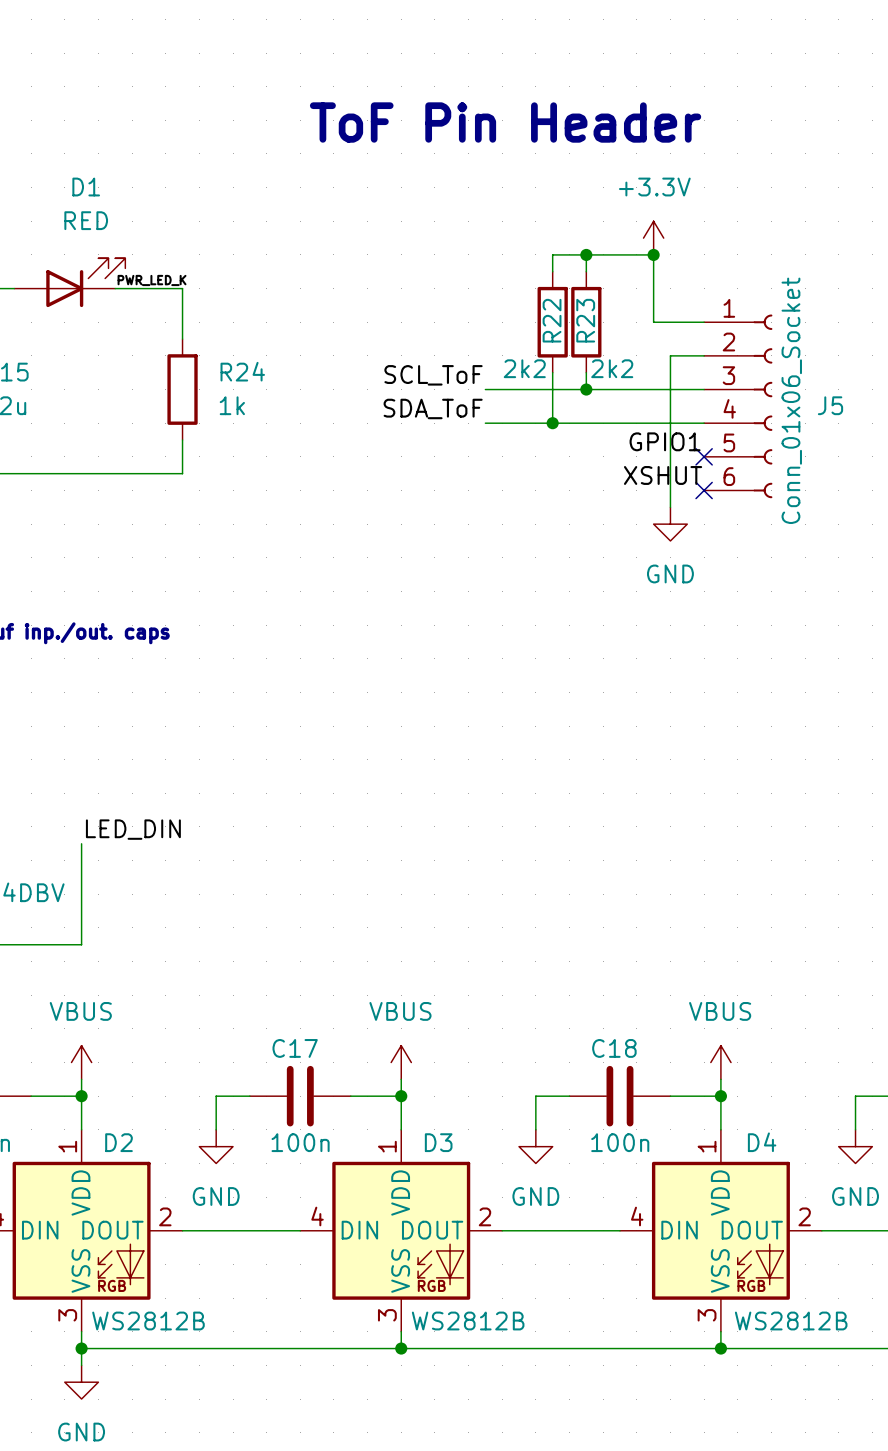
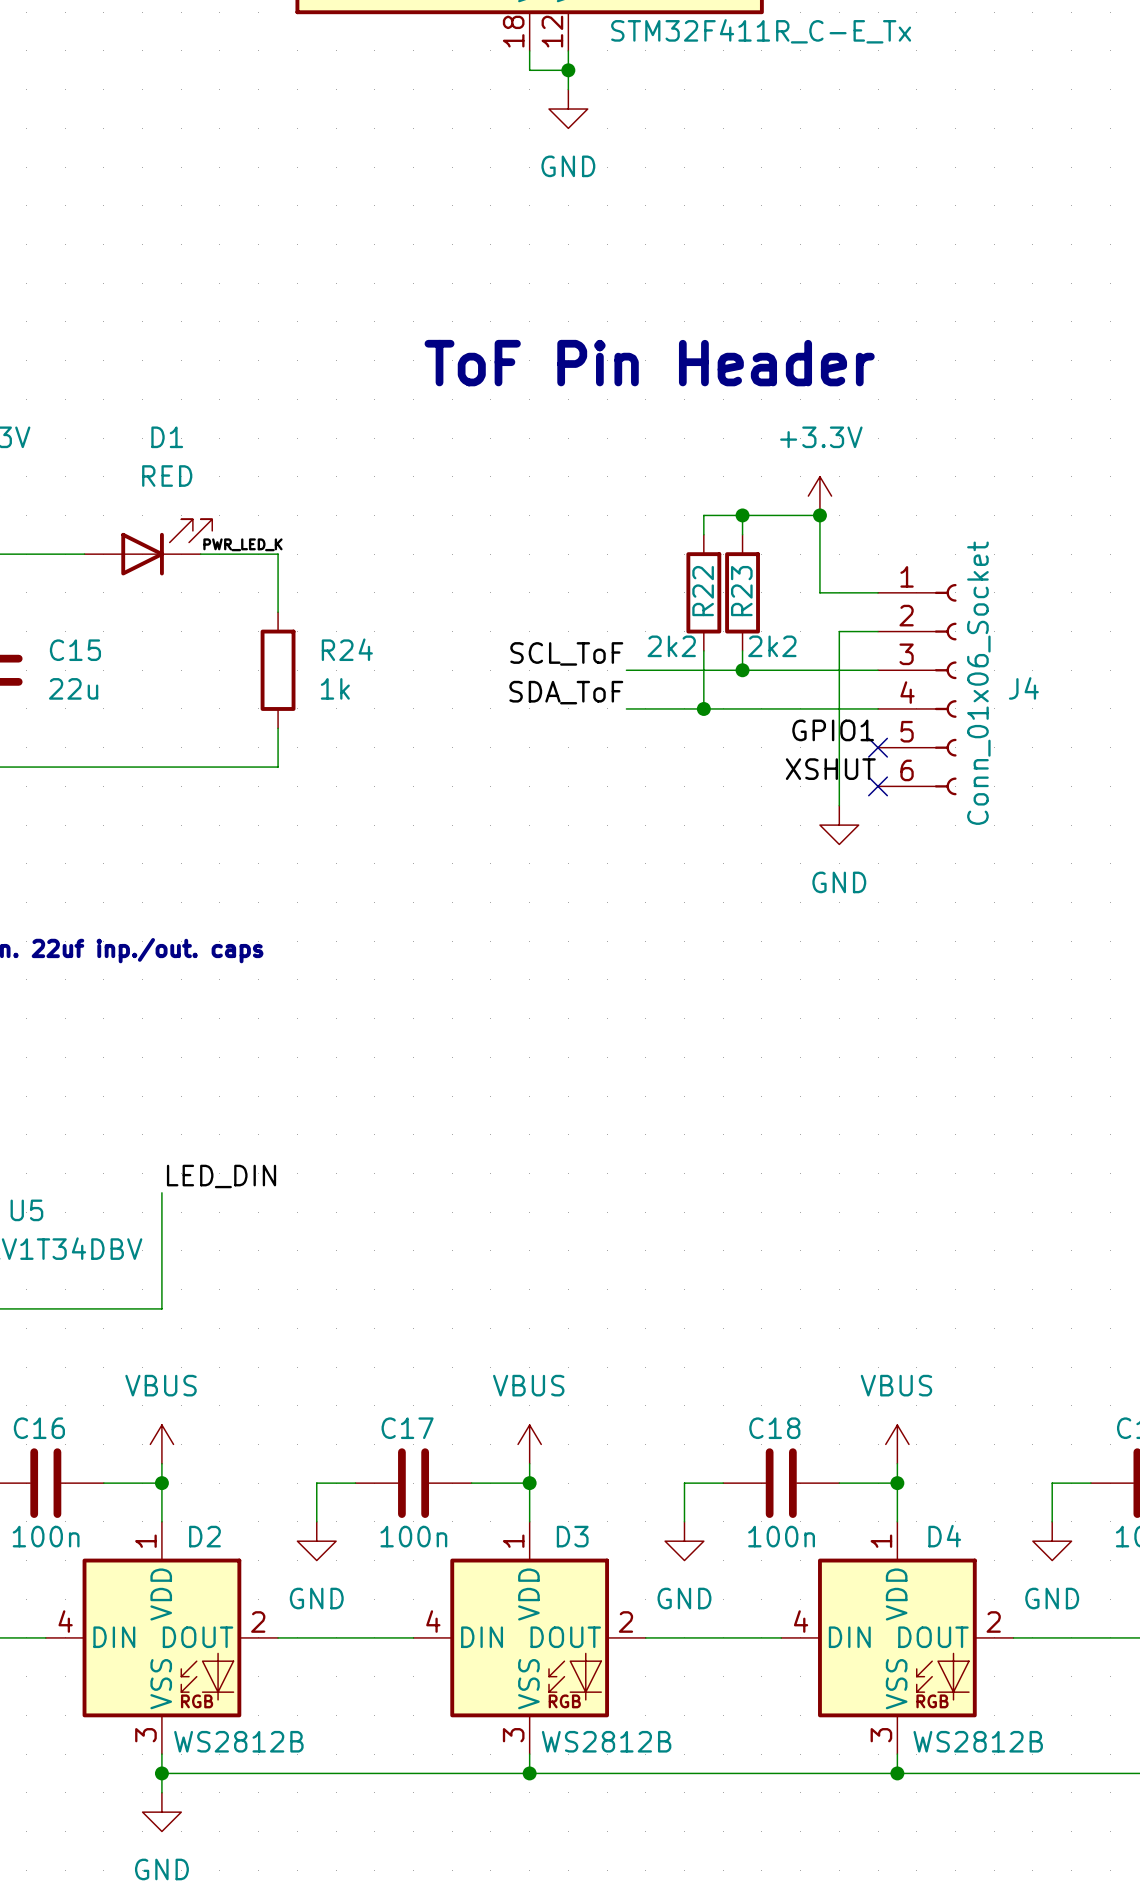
J5 name: J5 (830, 405) -> J4 (1023, 688)

